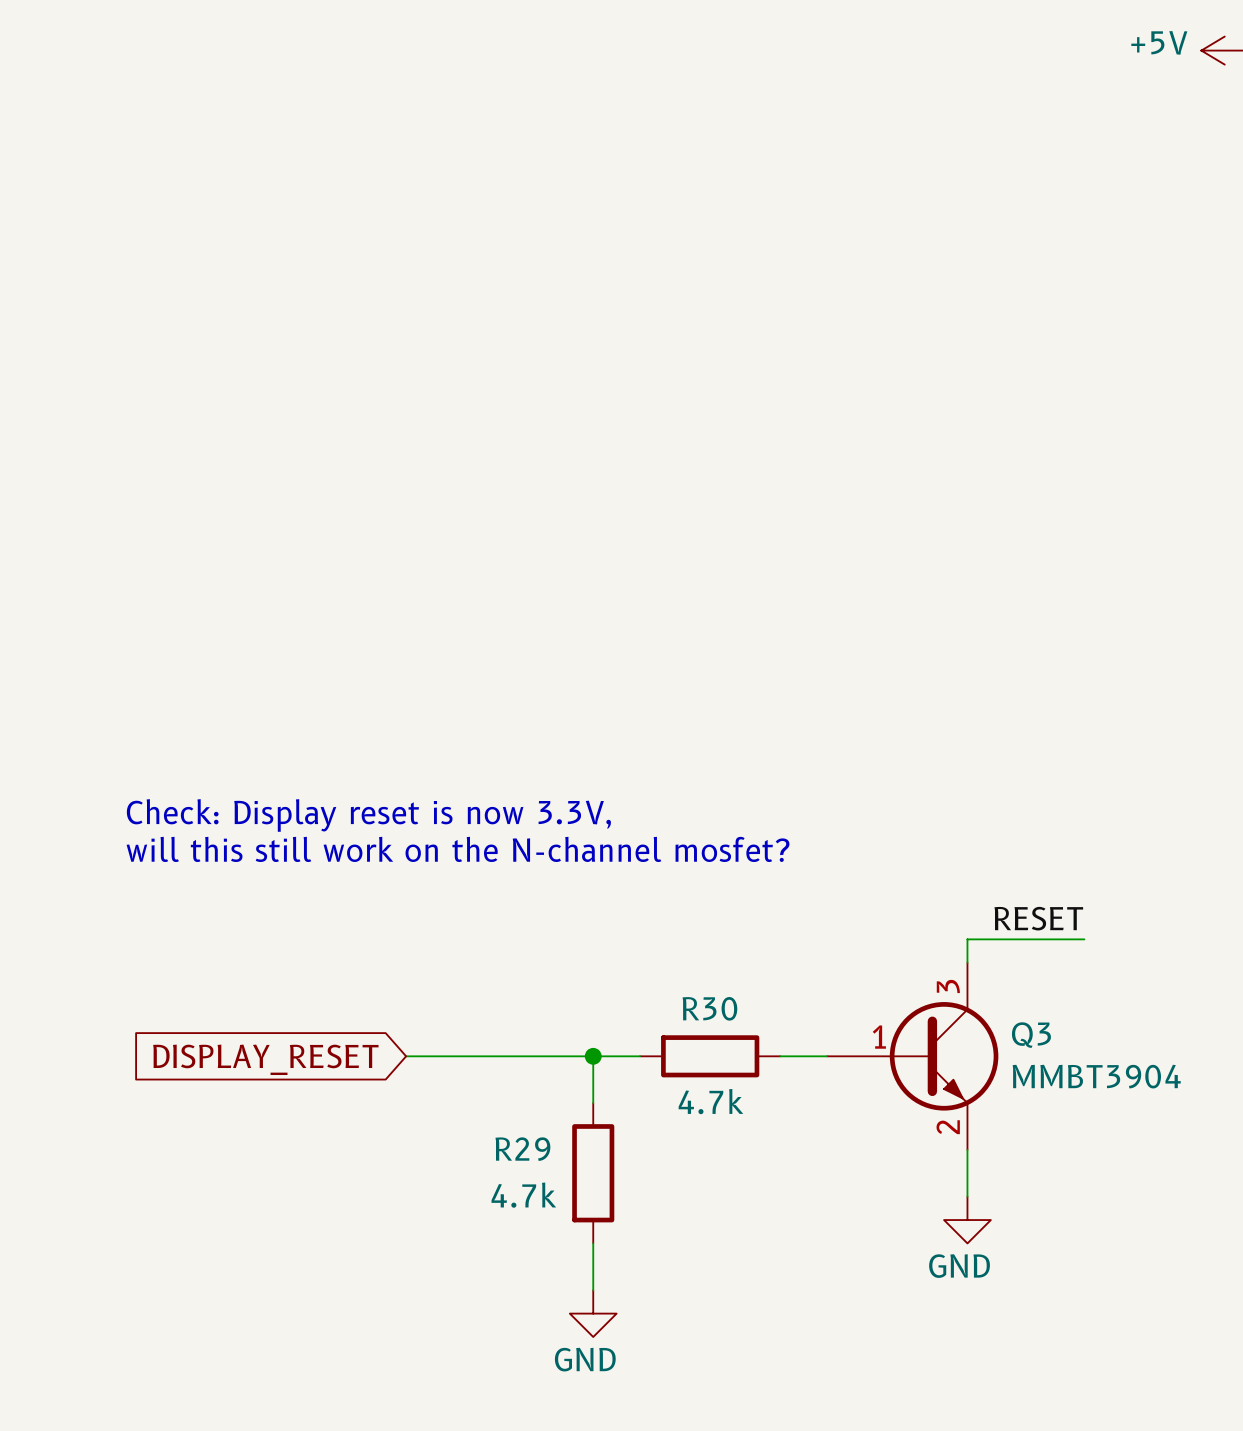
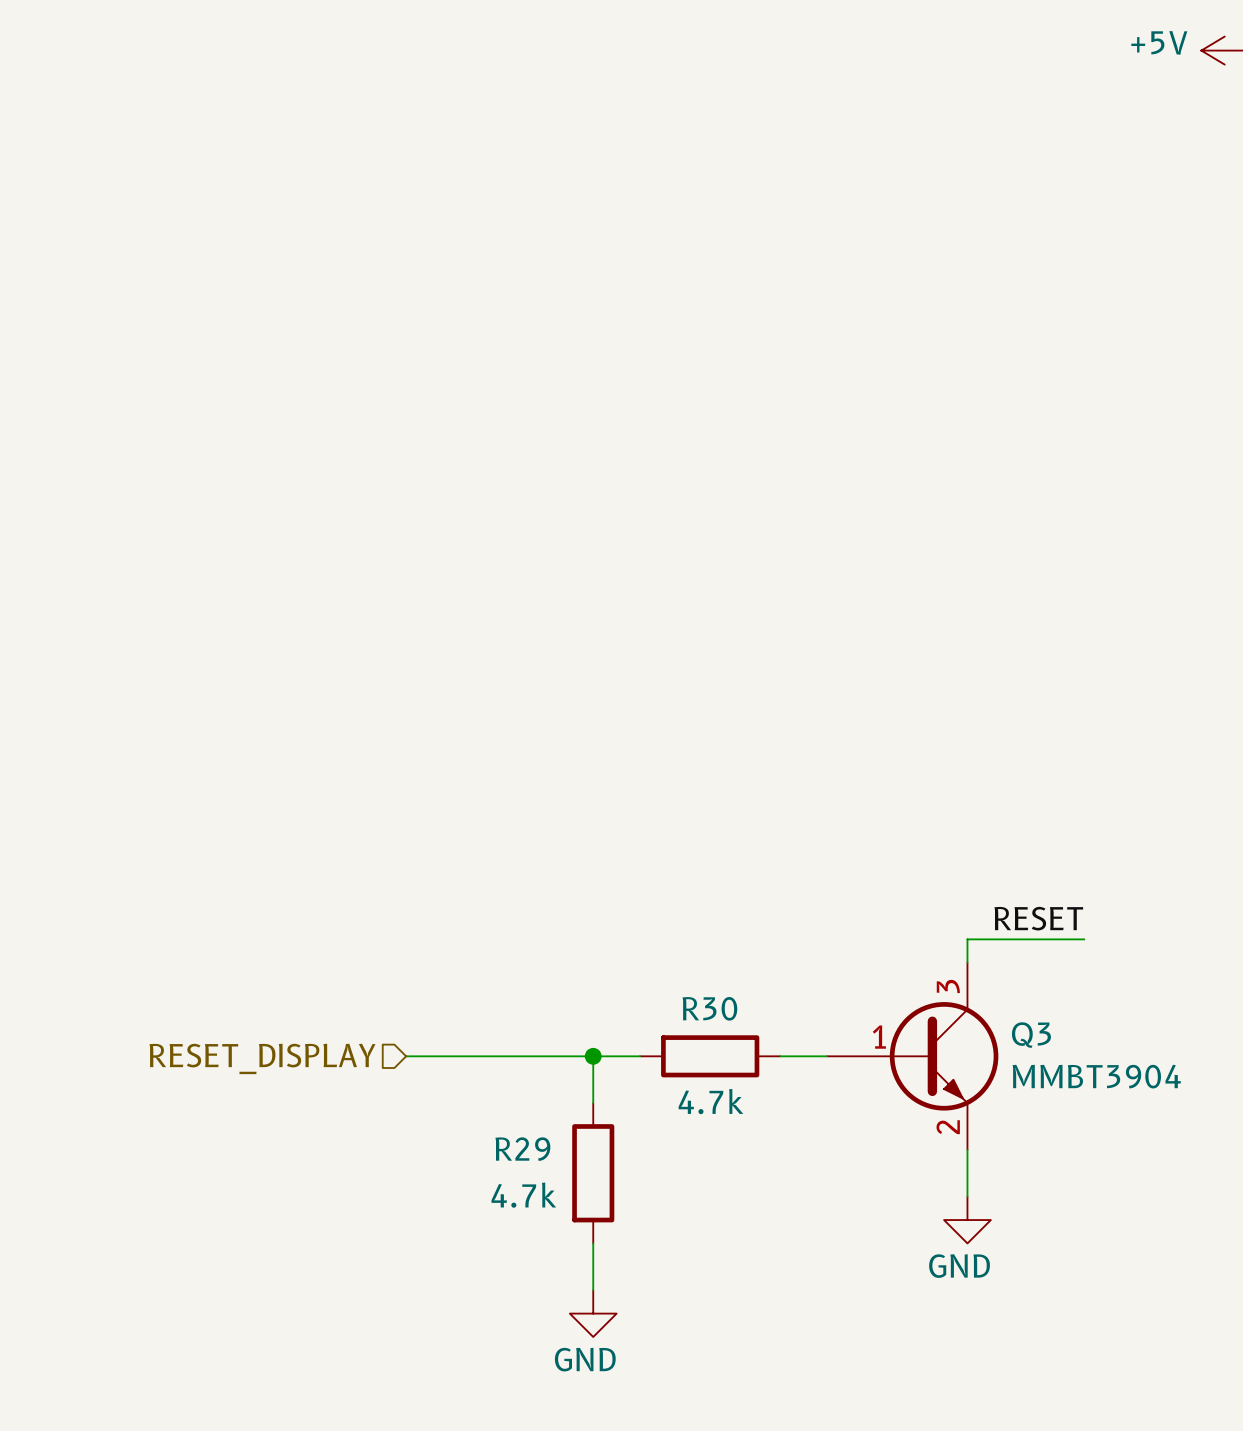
text: Check: Display reset is now 3.3V, (368, 815) -> none
text: will this still work on the N-channel mosfet? (458, 849) -> none
hierarchical label: none -> RESET_DISPLAY (262, 1058)
global label: DISPLAY_RESET (265, 1059) -> none

